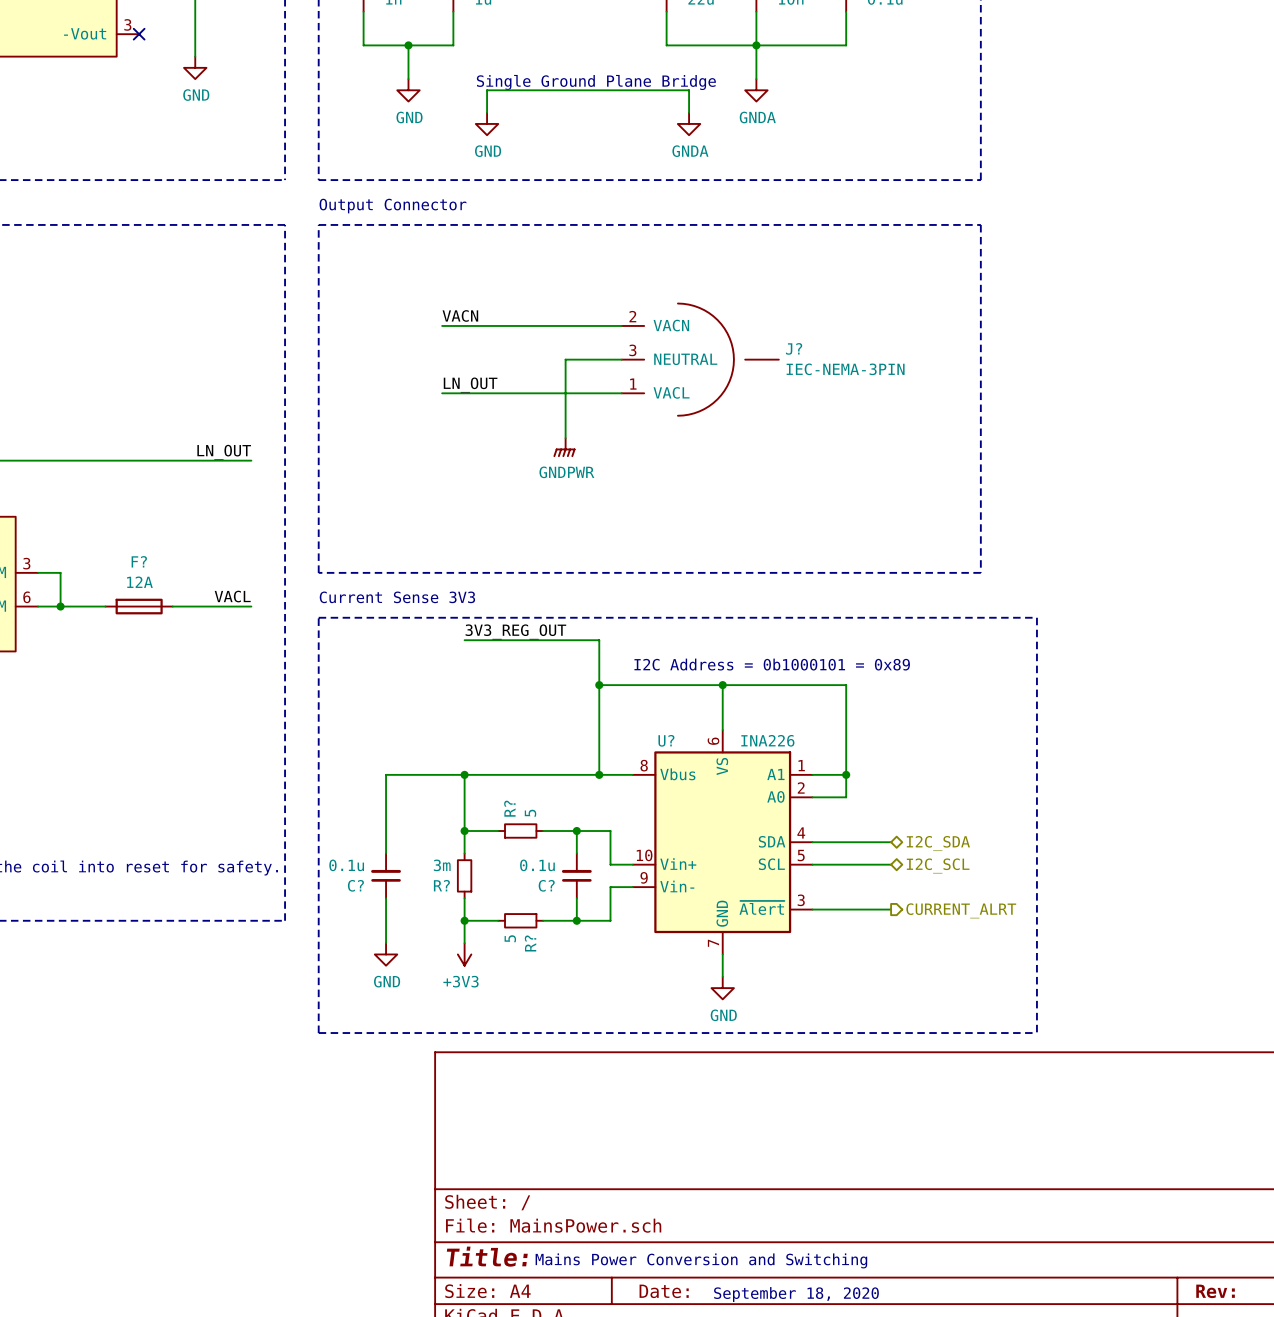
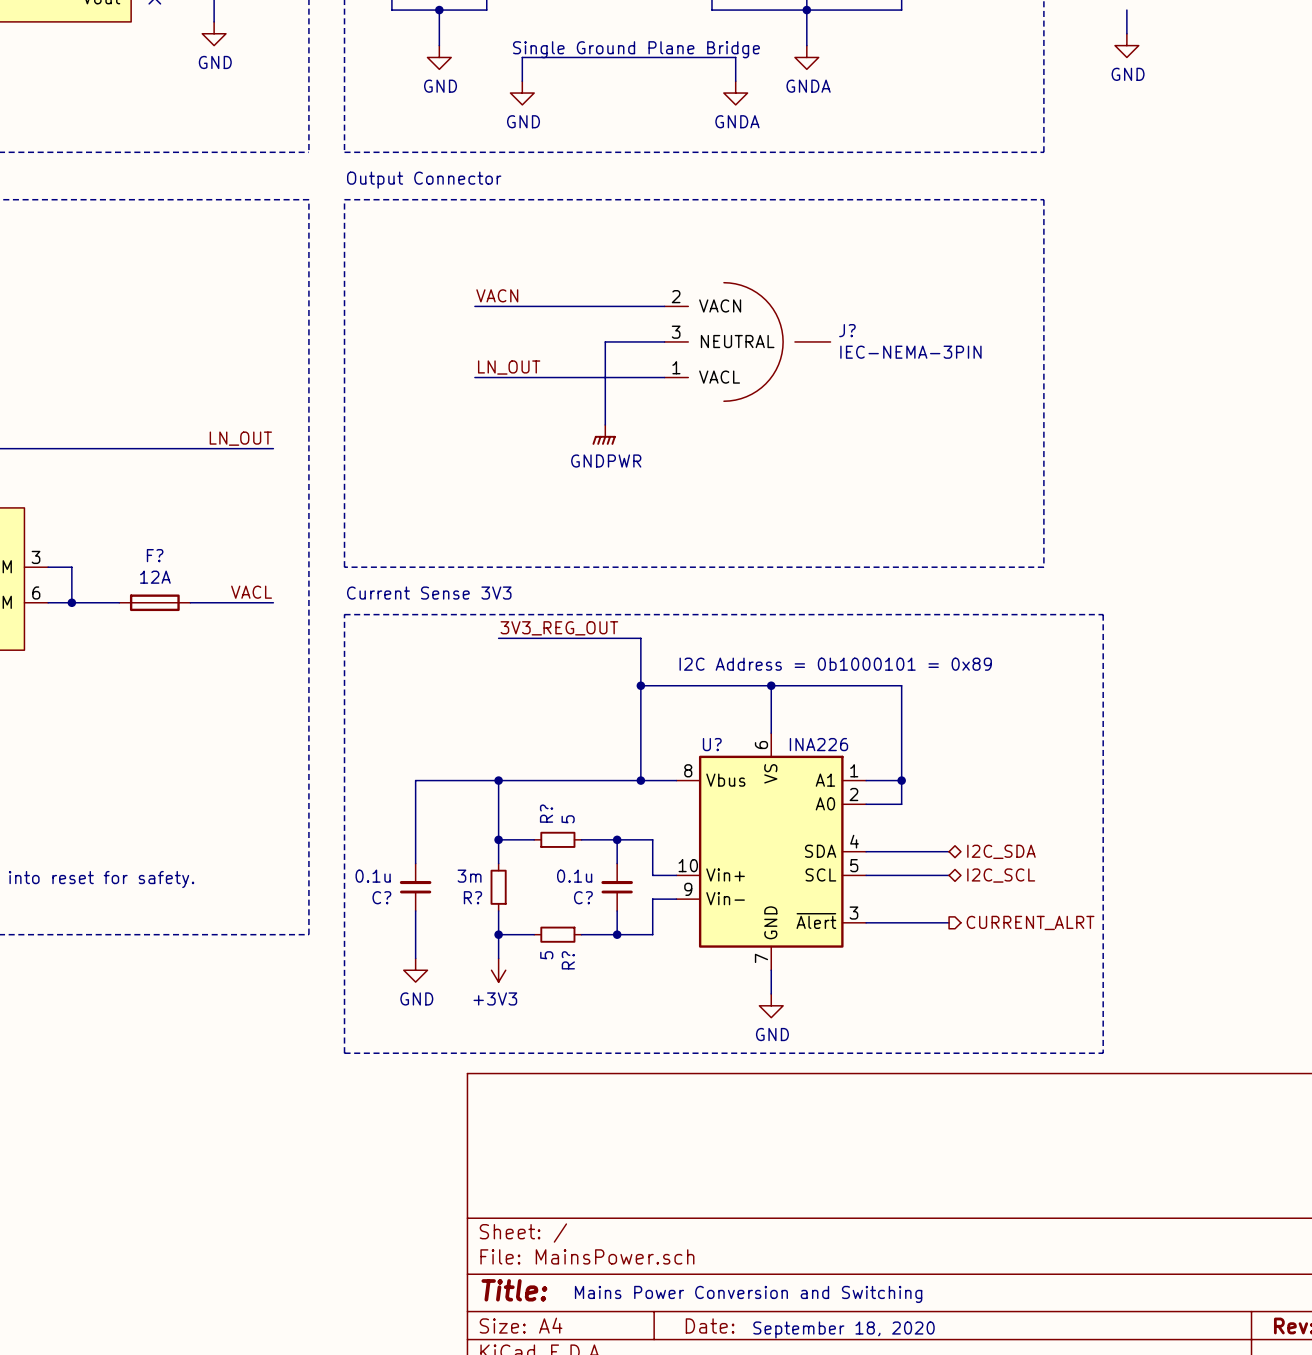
wire: none -> (1126, 10) (1126, 33)
power symbol: none -> GND (1126, 45)

